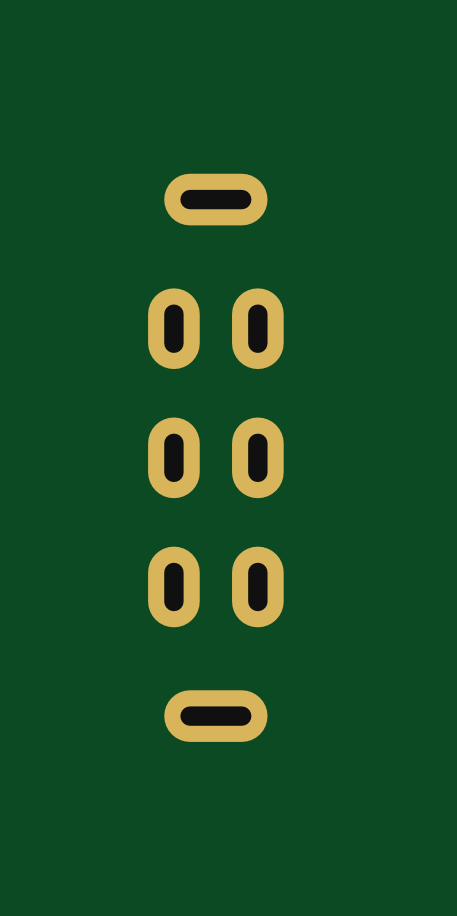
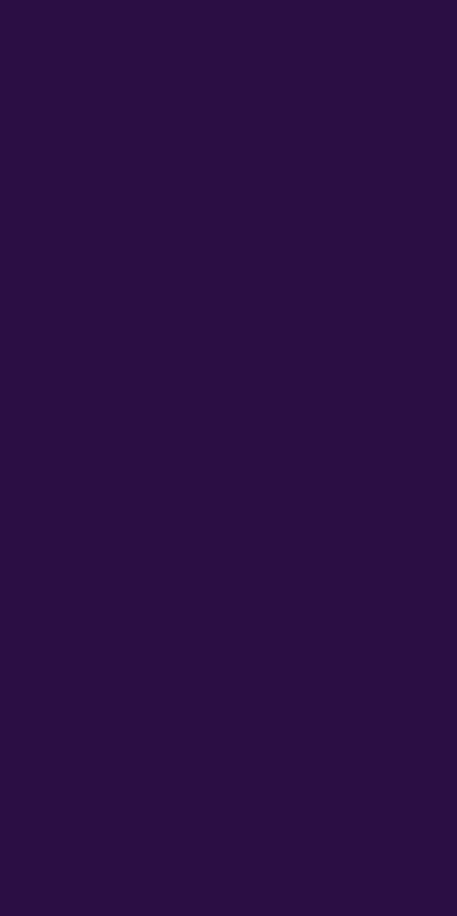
part: (215, 457) -> none

